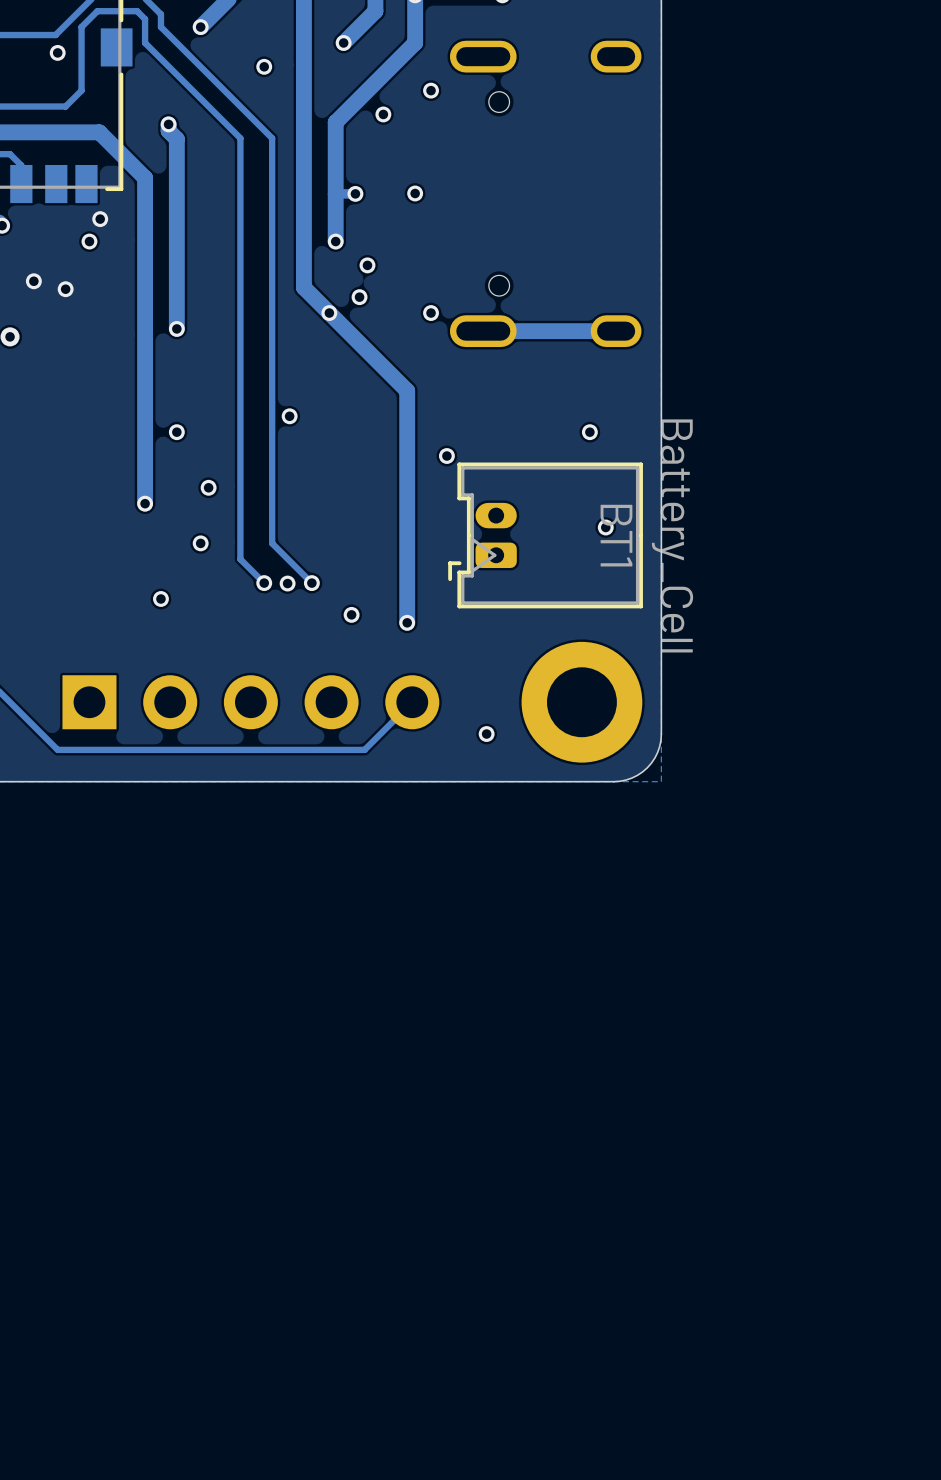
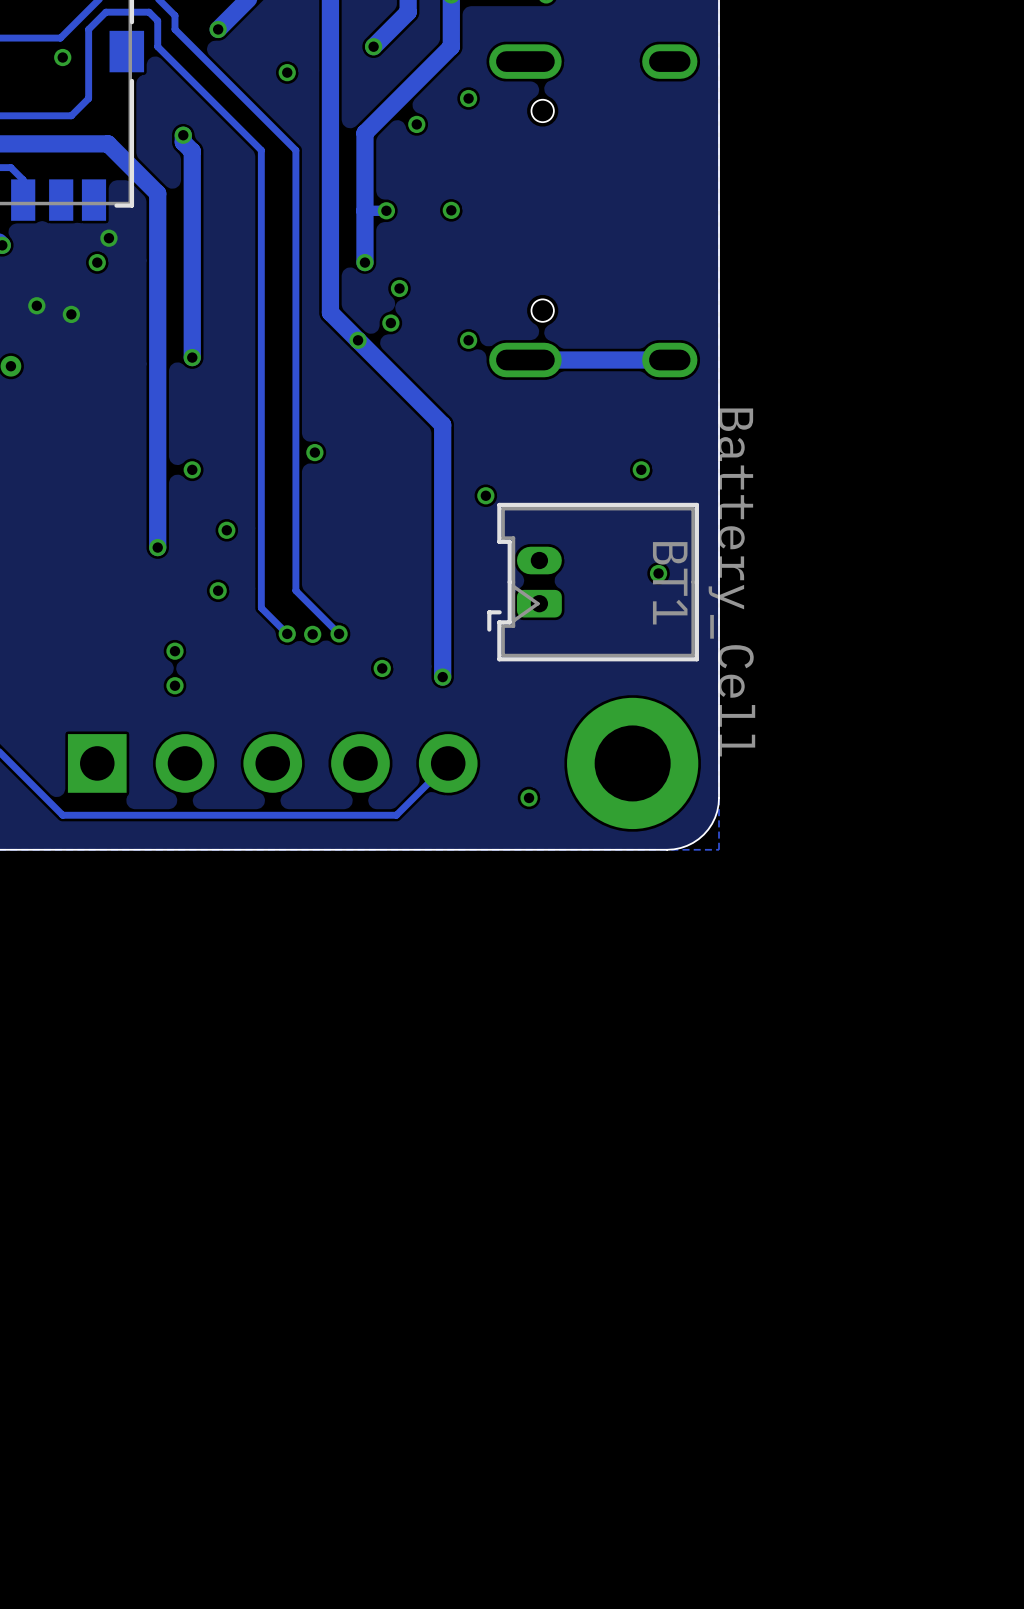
via: none -> (174, 685)

